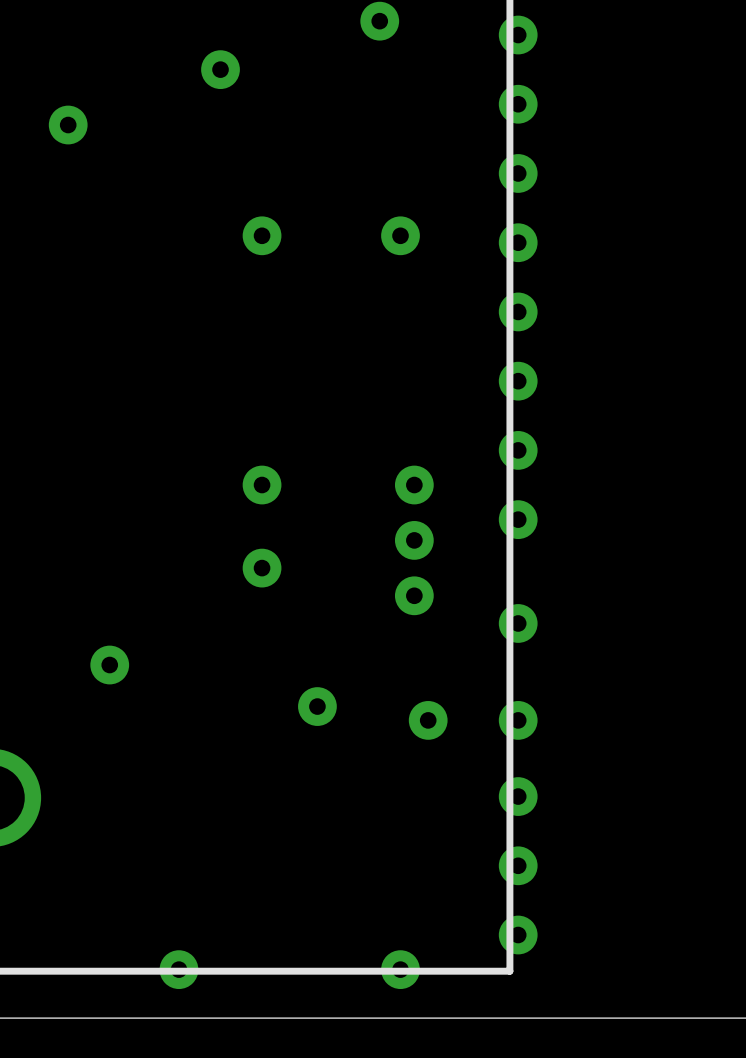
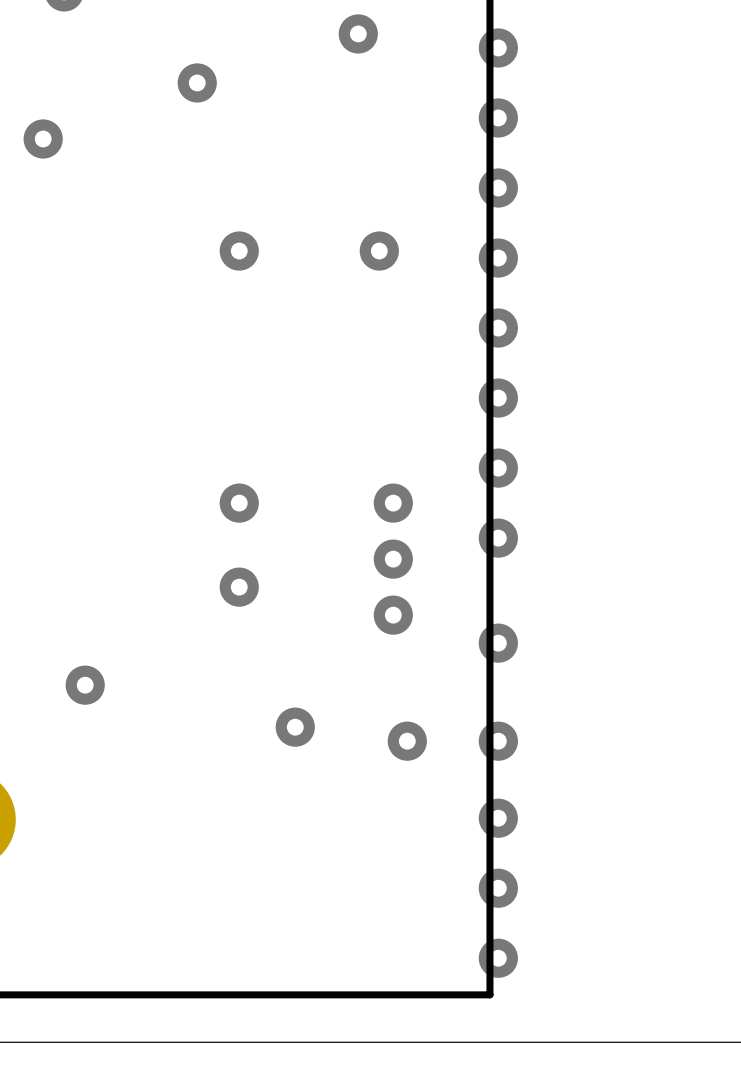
via: (178, 969) -> none
via: (400, 969) -> none

